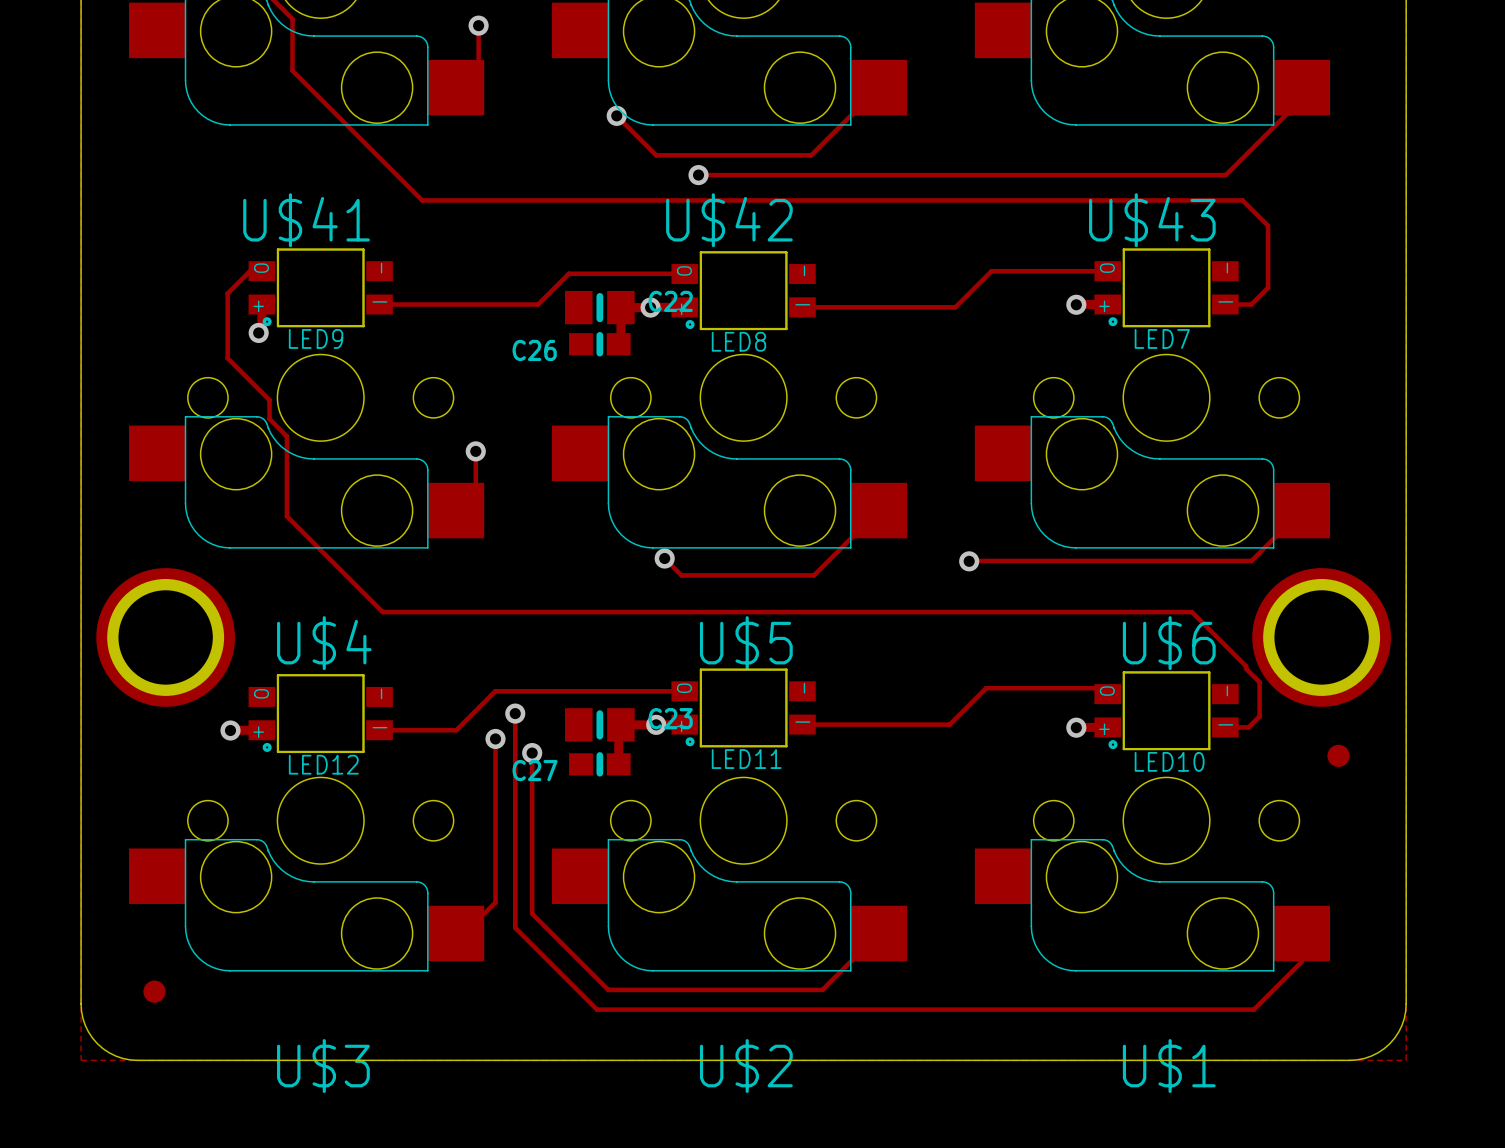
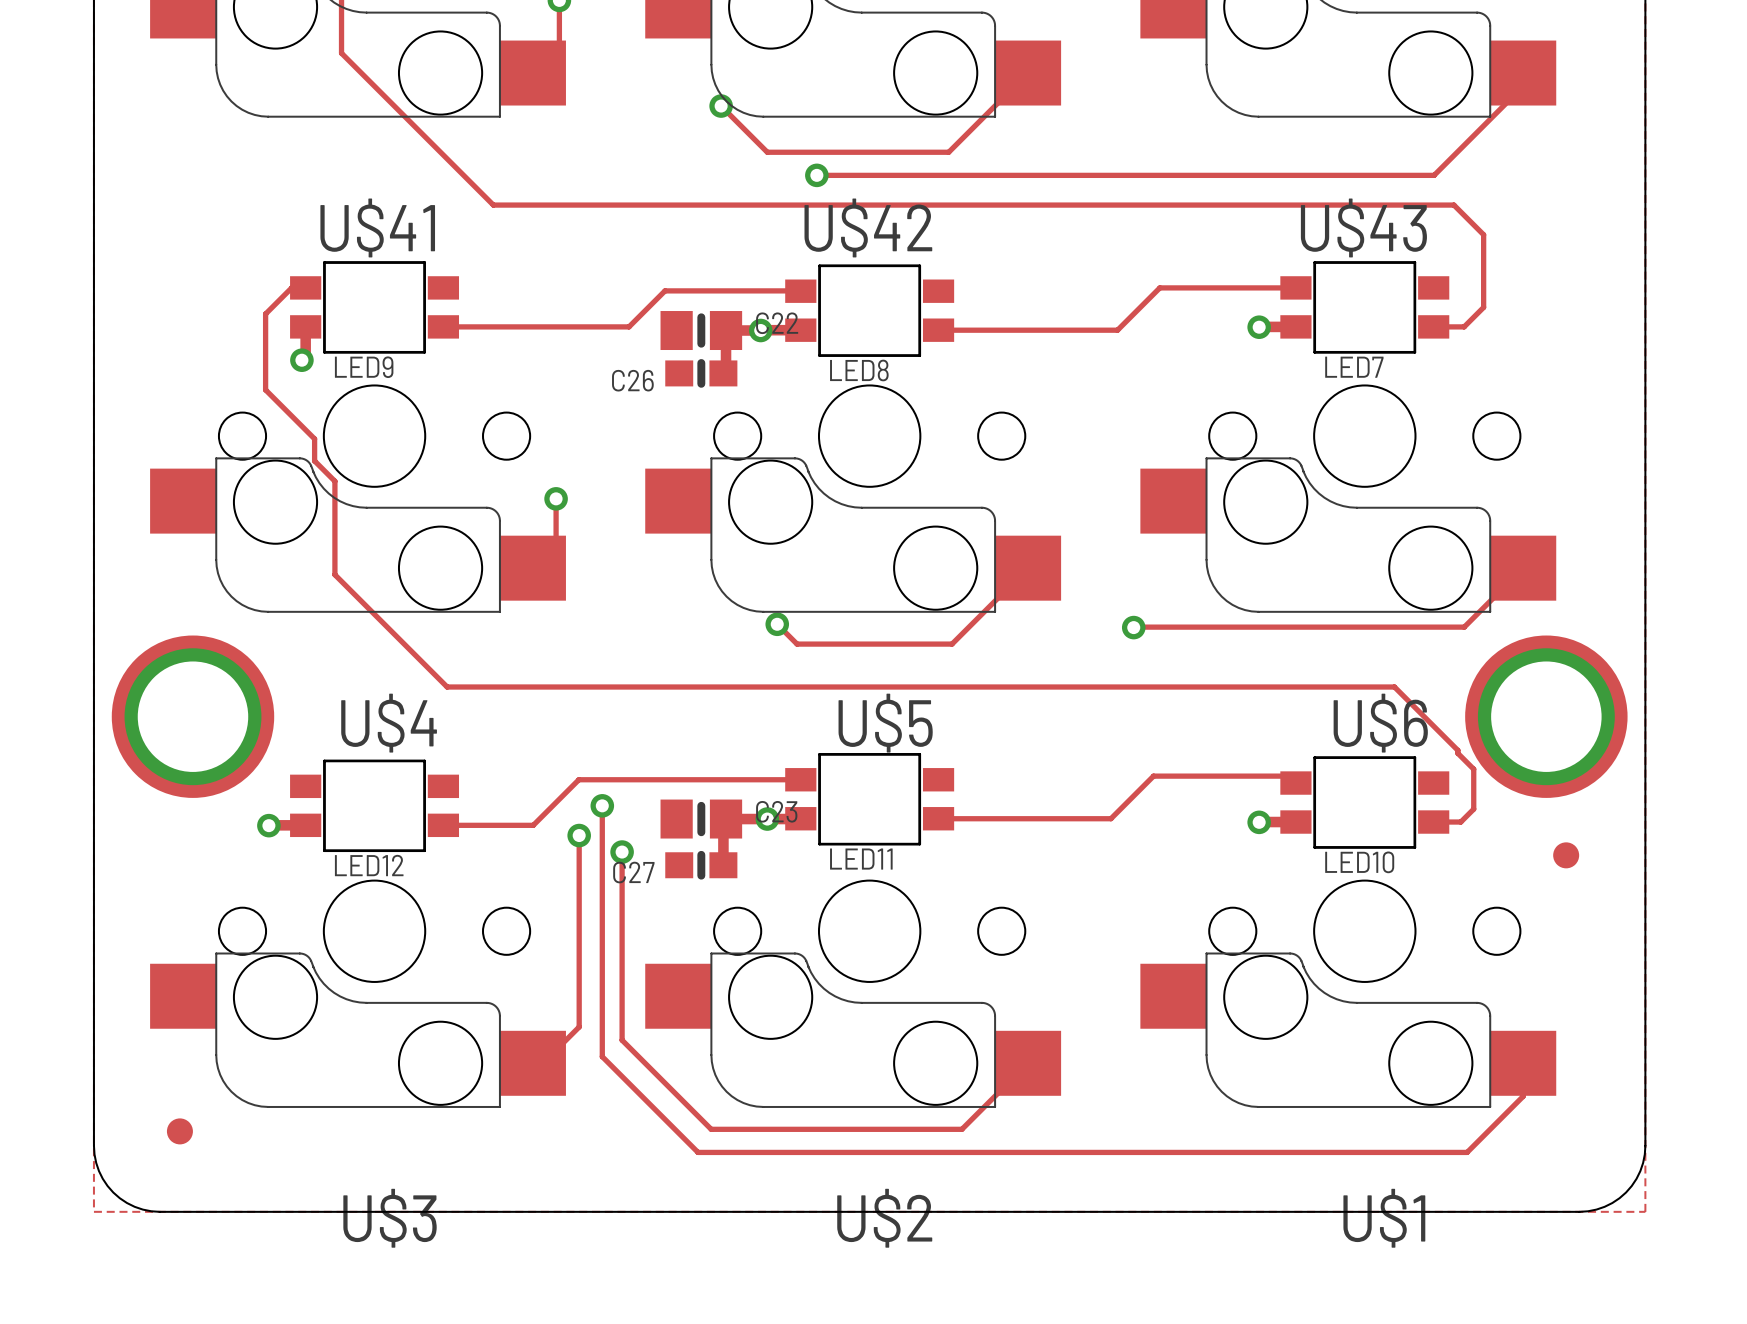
LED9 footprint: [248, 248, 393, 328] -> [290, 261, 460, 354]
LED7 footprint: [1094, 248, 1239, 328] -> [1280, 261, 1450, 354]
LED8 footprint: [671, 251, 816, 331] -> [785, 264, 955, 357]
LED11 footprint: [671, 668, 816, 748] -> [785, 753, 955, 846]
LED10 footprint: [1094, 671, 1239, 751] -> [1280, 756, 1450, 849]
LED12 footprint: [248, 674, 393, 754] -> [290, 759, 460, 853]

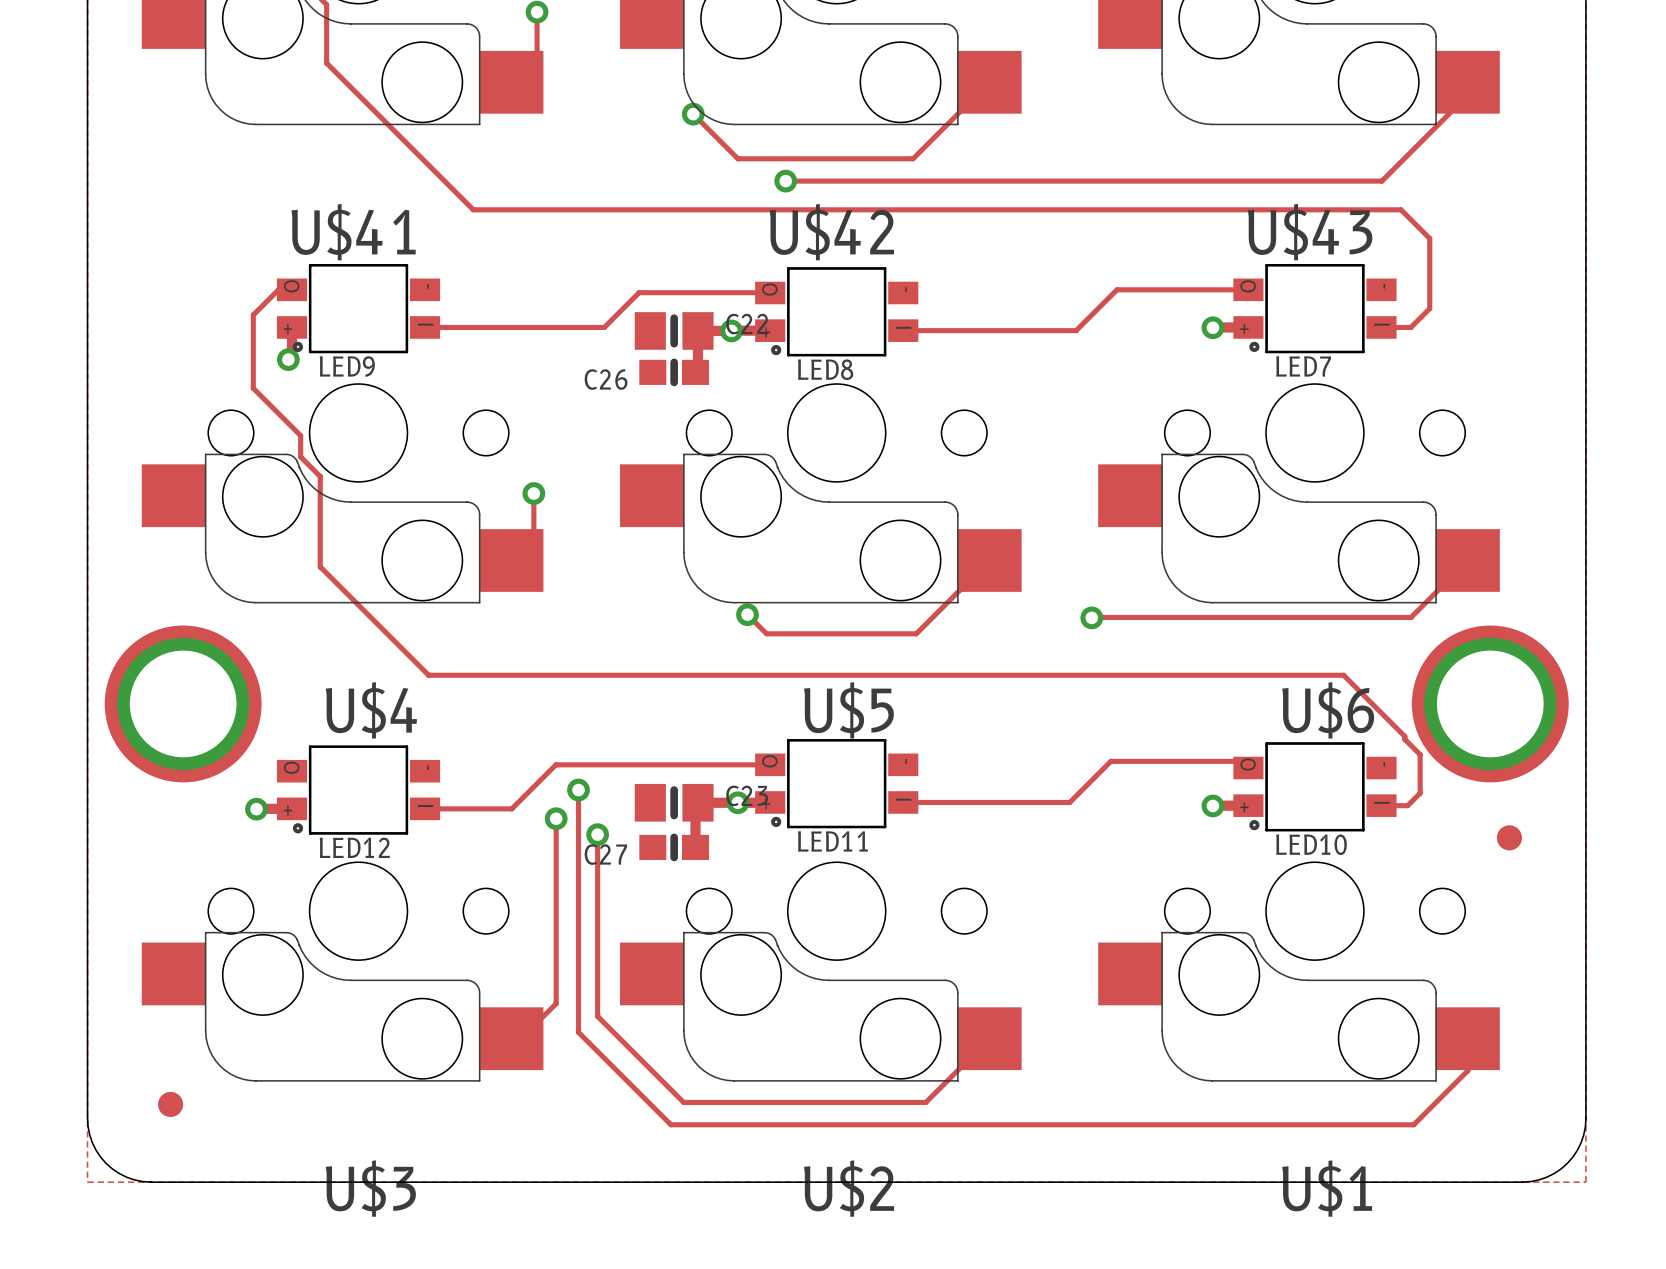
LED9 footprint: [290, 261, 460, 354] -> [276, 264, 441, 354]
LED7 footprint: [1280, 261, 1450, 354] -> [1233, 264, 1397, 354]
LED8 footprint: [785, 264, 955, 357] -> [755, 267, 919, 357]
LED11 footprint: [785, 753, 955, 846] -> [755, 739, 919, 829]
LED10 footprint: [1280, 756, 1450, 849] -> [1233, 742, 1397, 832]
LED12 footprint: [290, 759, 460, 853] -> [276, 745, 441, 835]

